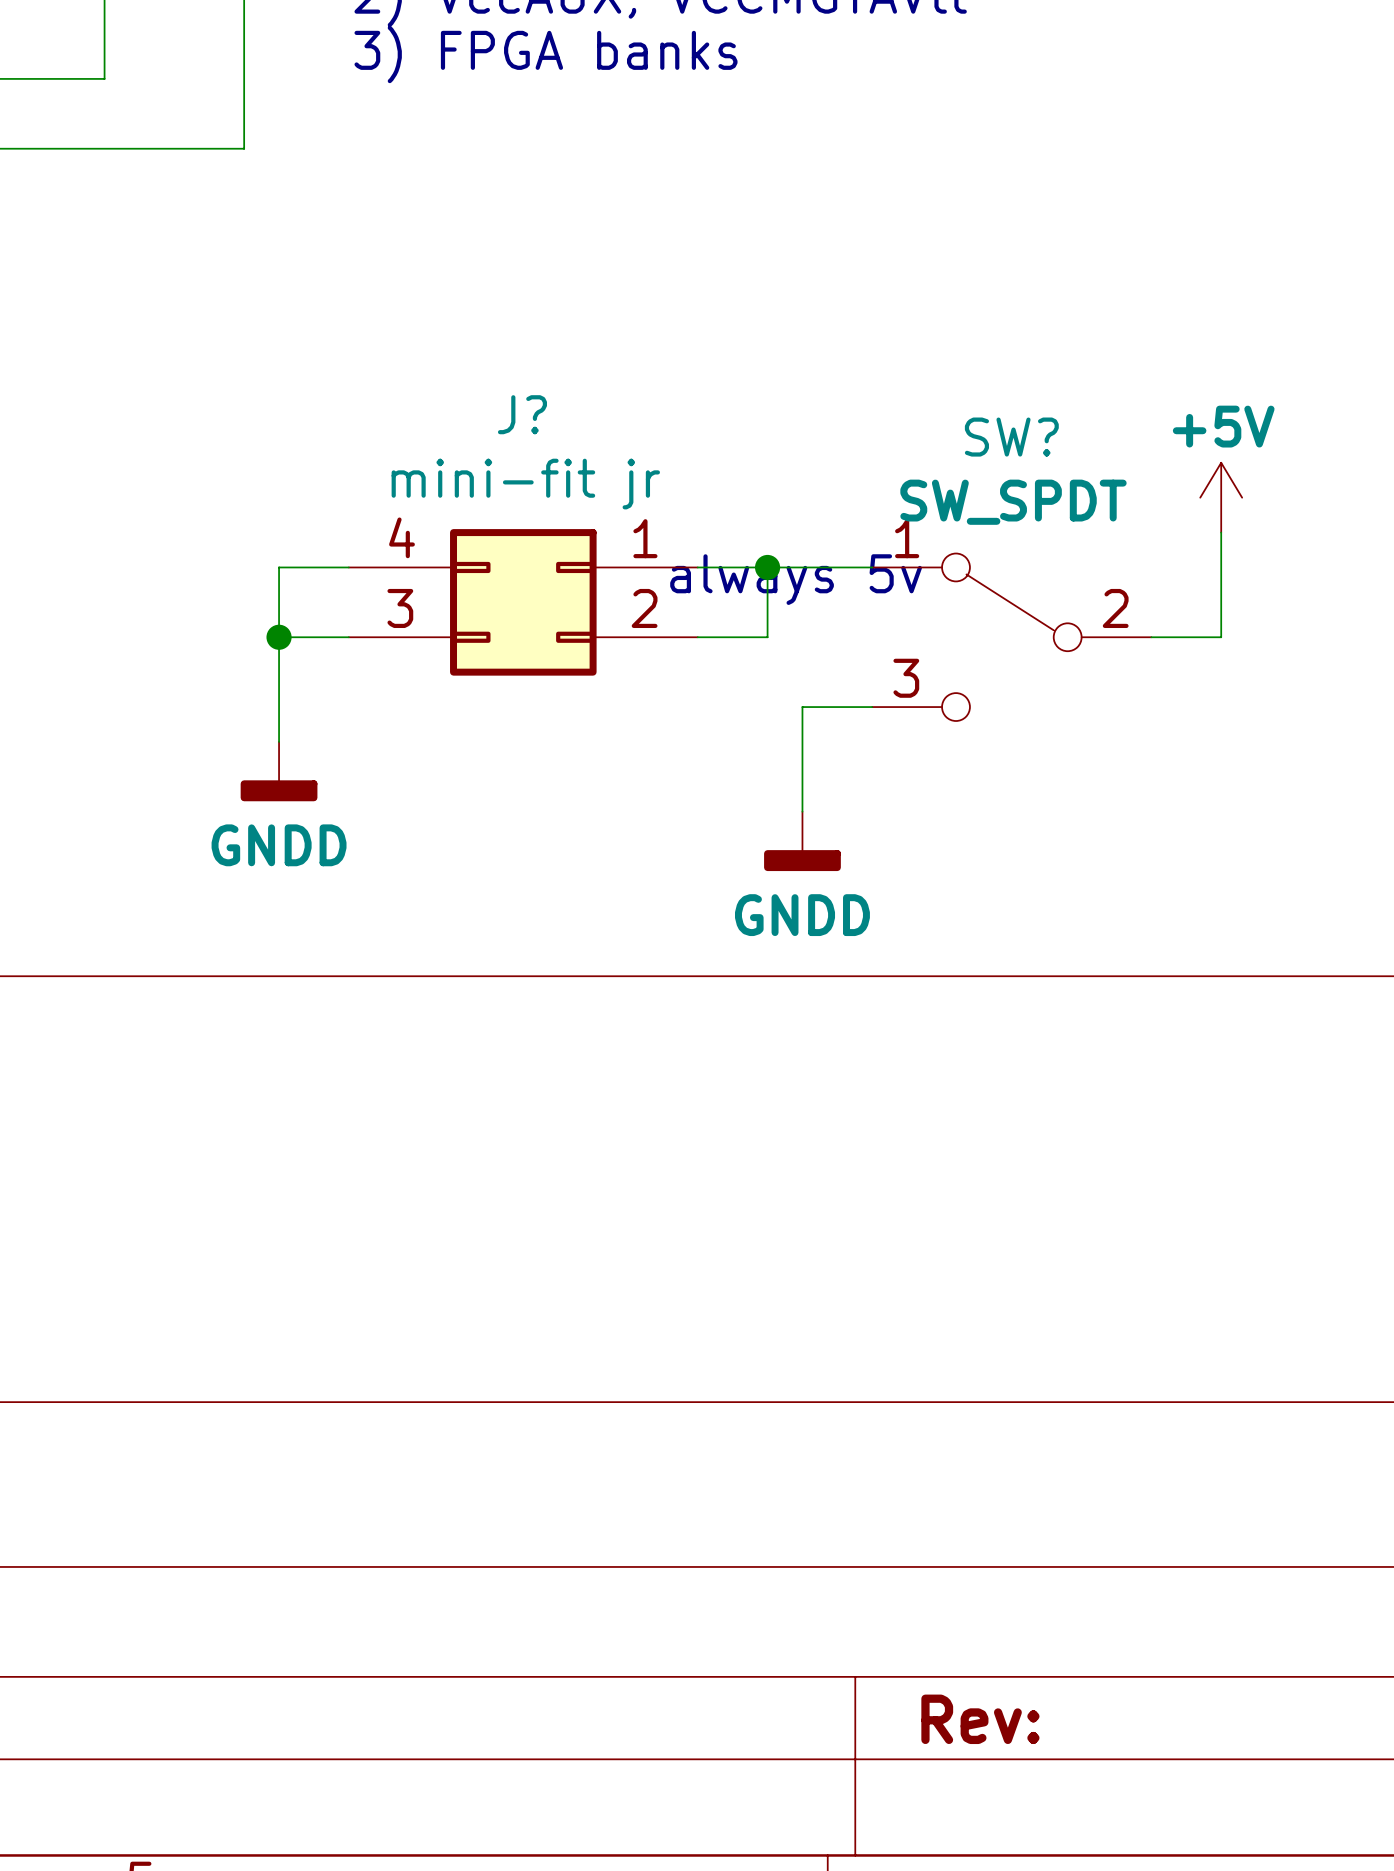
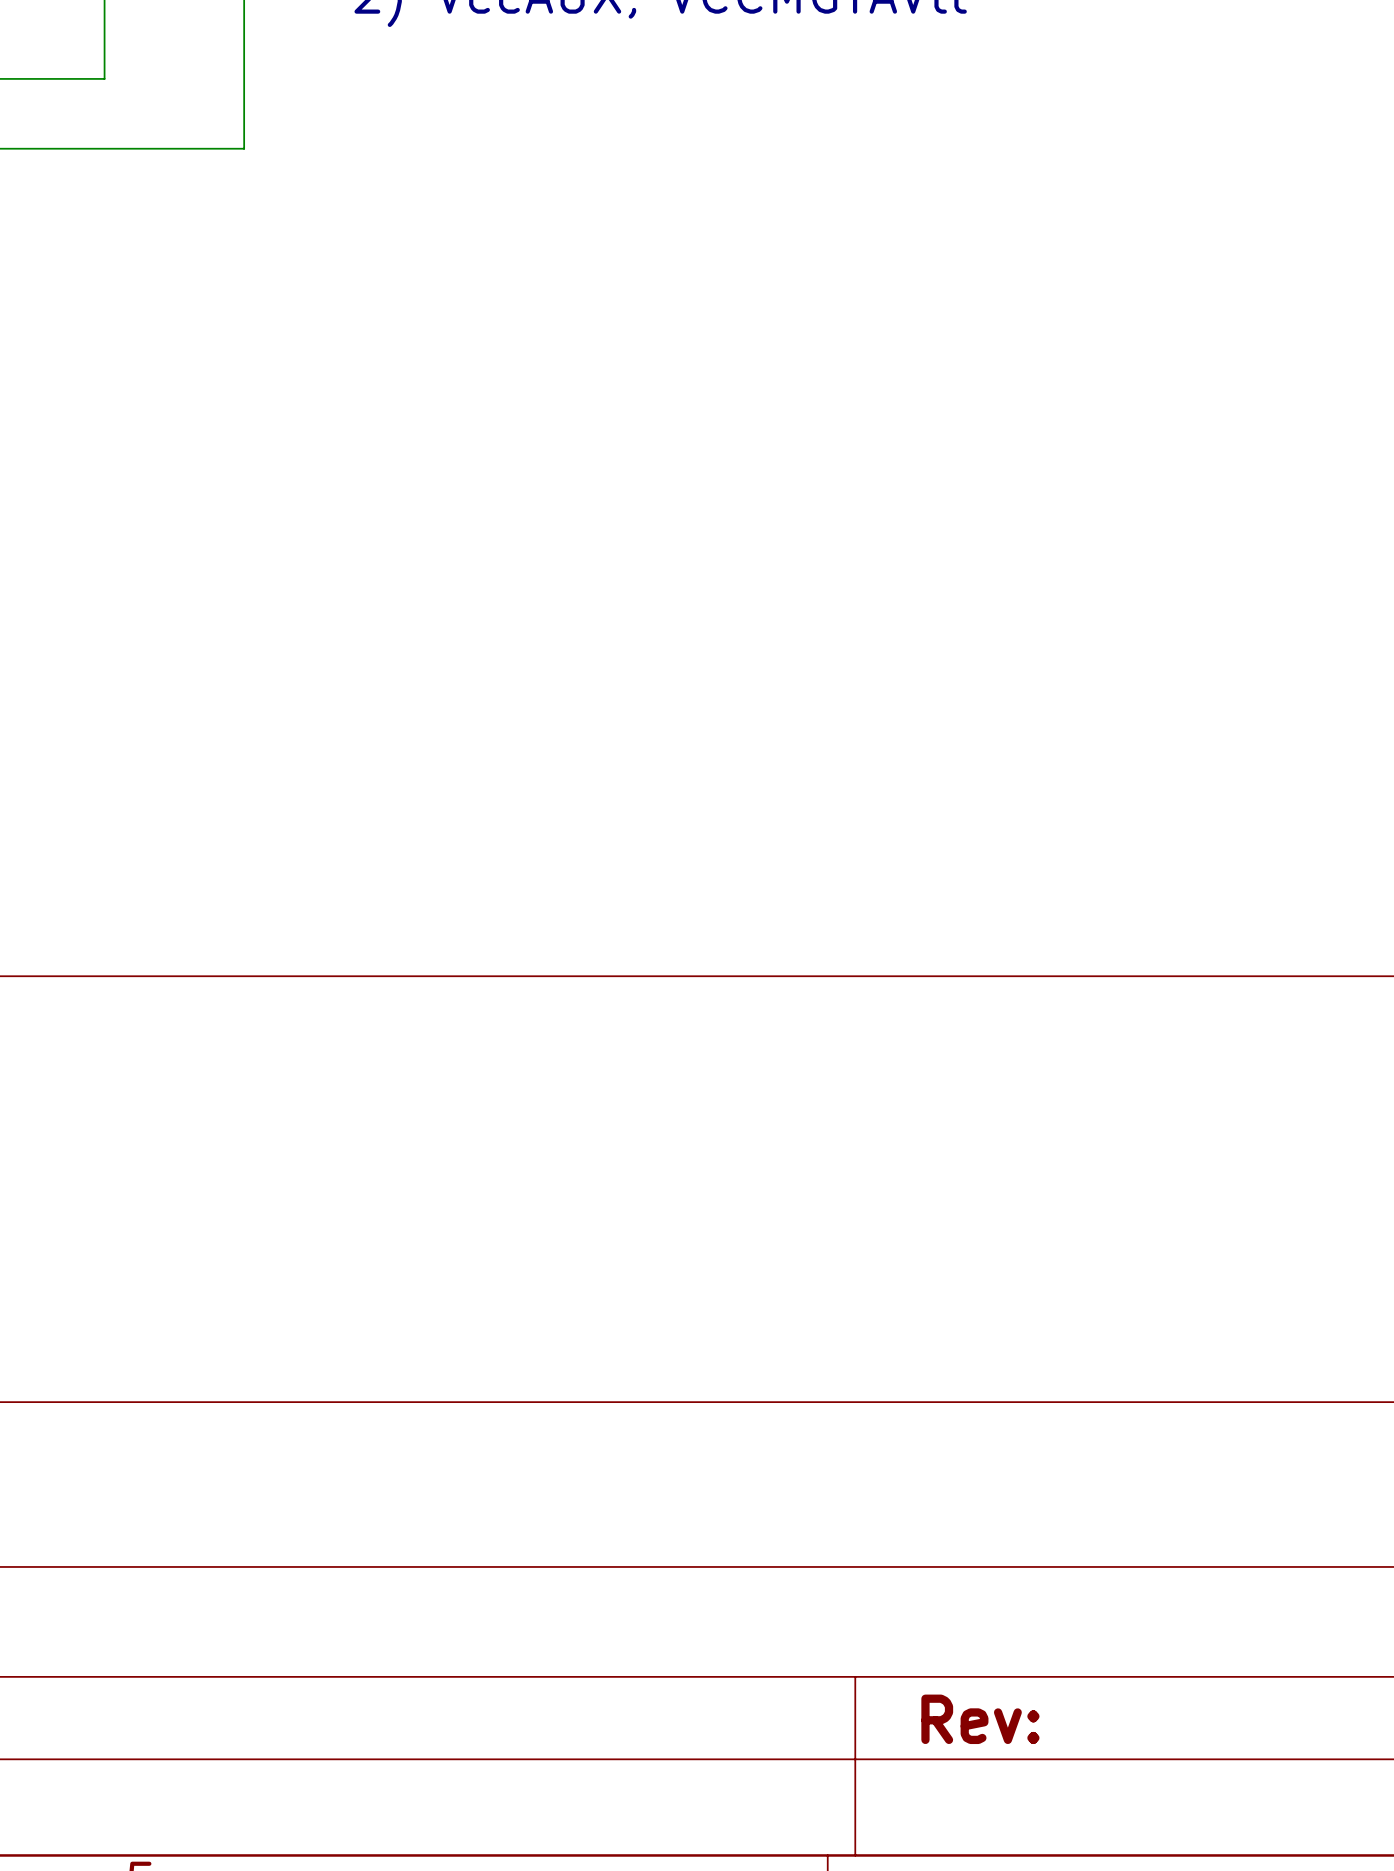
text: 3) FPGA banks (546, 54) -> none
power symbol: +5V (1221, 497) -> none
wire: (1221, 532) (1221, 637) (1151, 637) -> none
wire: (348, 567) (279, 567) (279, 741) -> none
wire: (697, 567) (872, 567) -> none
wire: (767, 567) (767, 637) (697, 637) -> none
junction: (767, 567) -> none
text: always 5v (796, 579) -> none
J?: mini-fit jr (523, 602) -> none
wire: (279, 637) (348, 637) -> none
junction: (279, 637) -> none
SW?: SW_SPDT (1011, 637) -> none
wire: (872, 707) (802, 707) (802, 811) -> none
power symbol: GNDD (279, 771) -> none
power symbol: GNDD (802, 841) -> none

